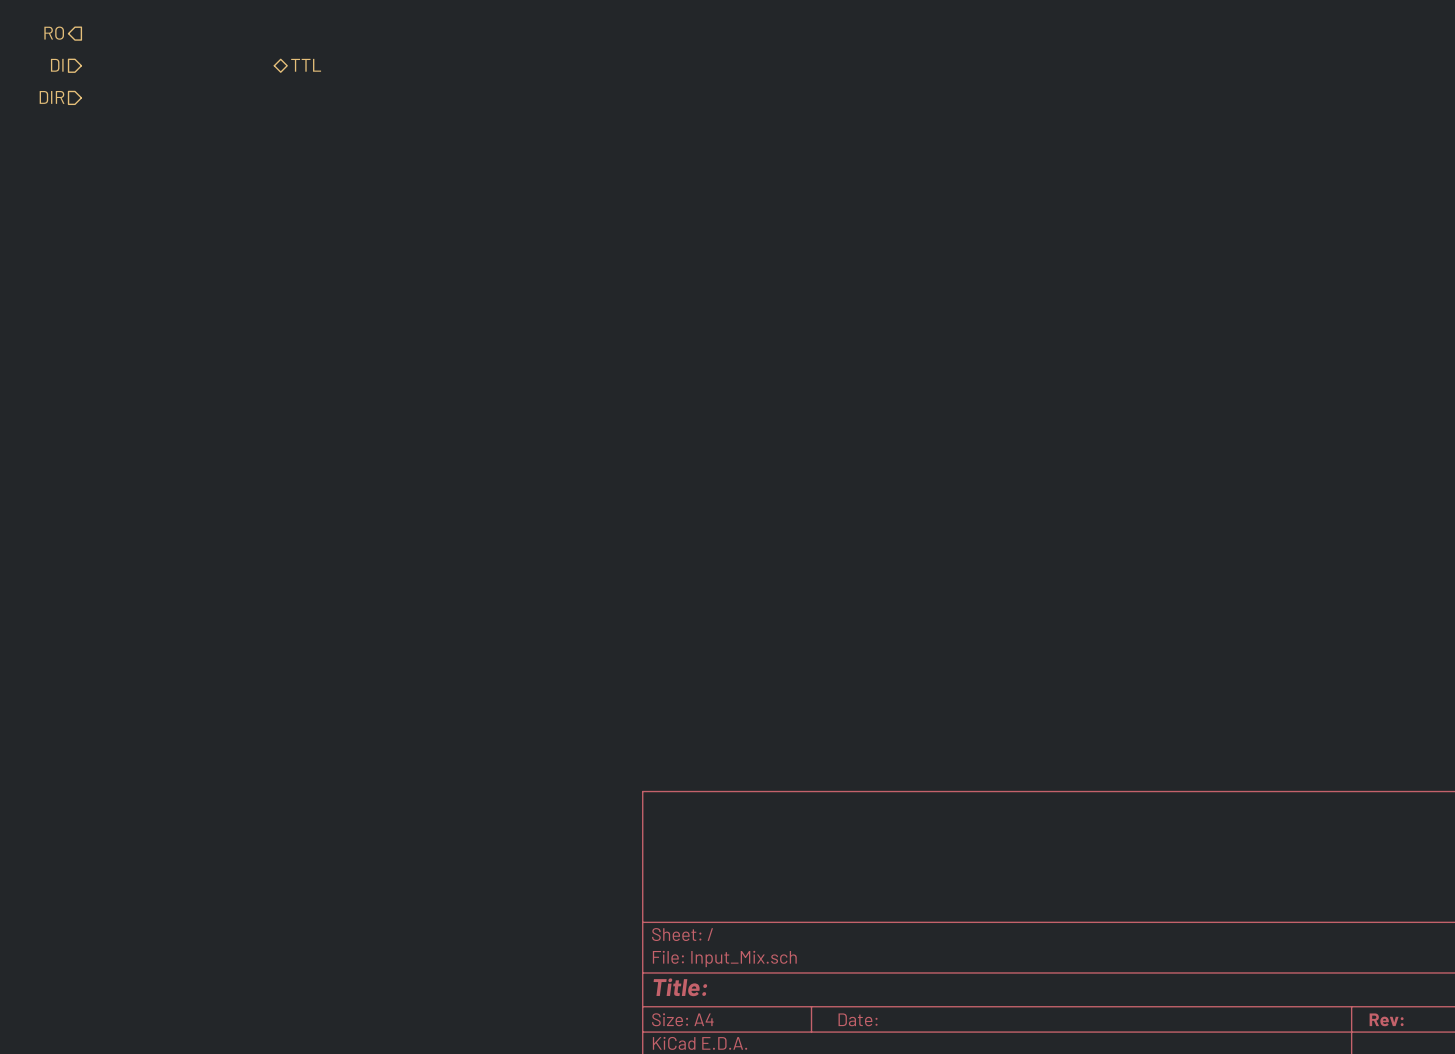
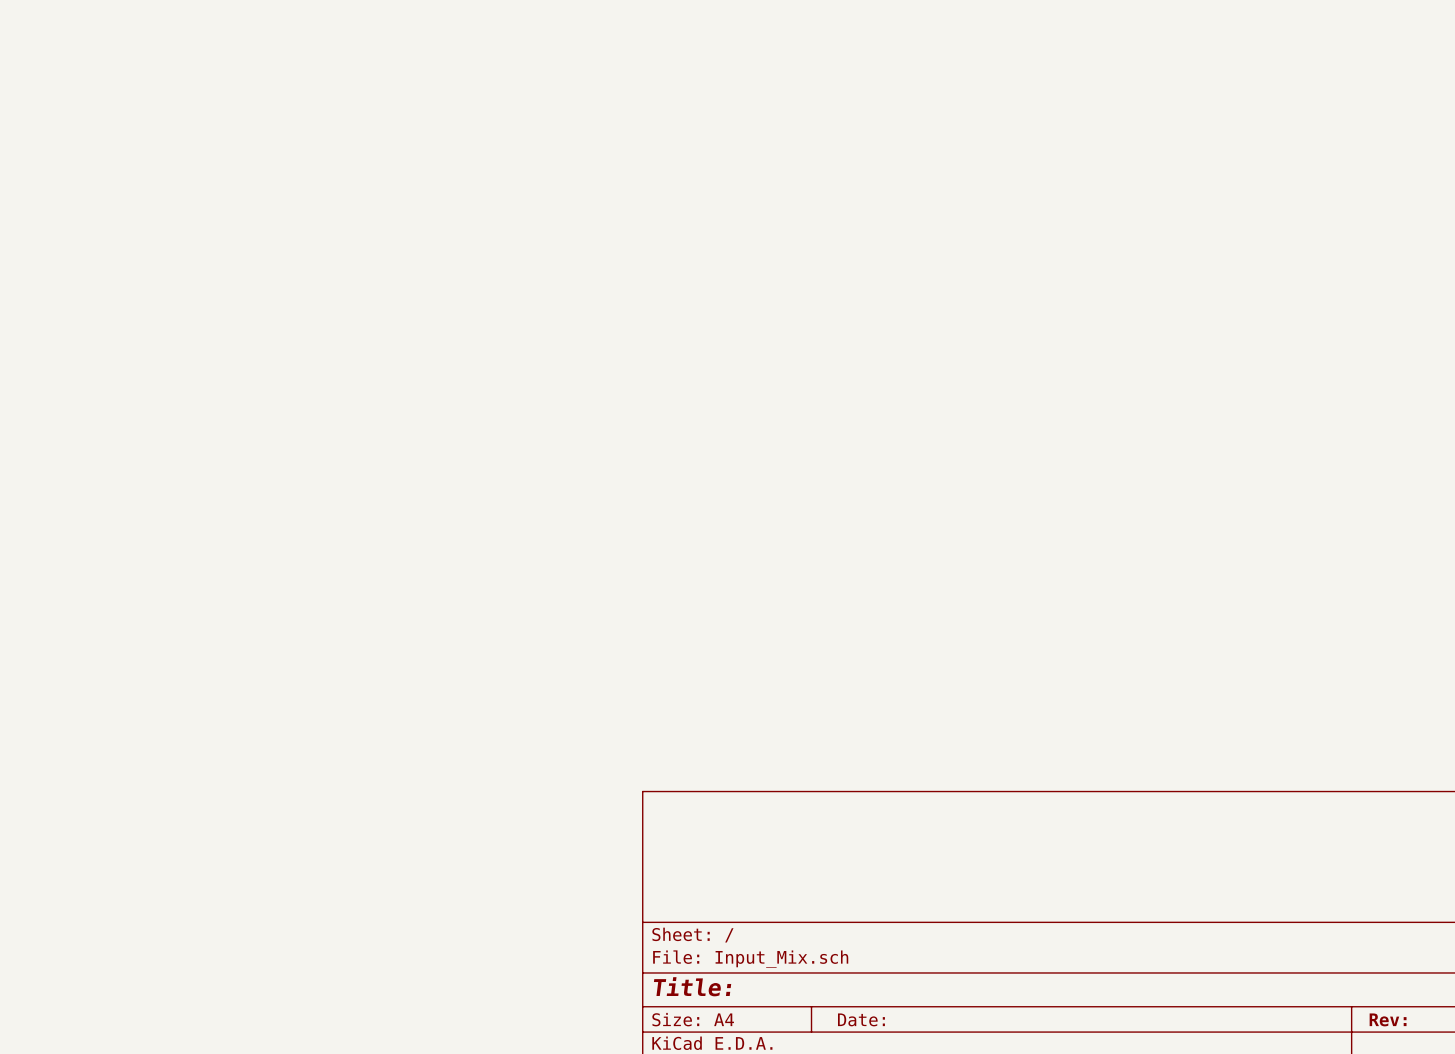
hierarchical label: RO (54, 33) -> none
hierarchical label: DI (57, 65) -> none
hierarchical label: TTL (306, 65) -> none
hierarchical label: DIR (52, 97) -> none

